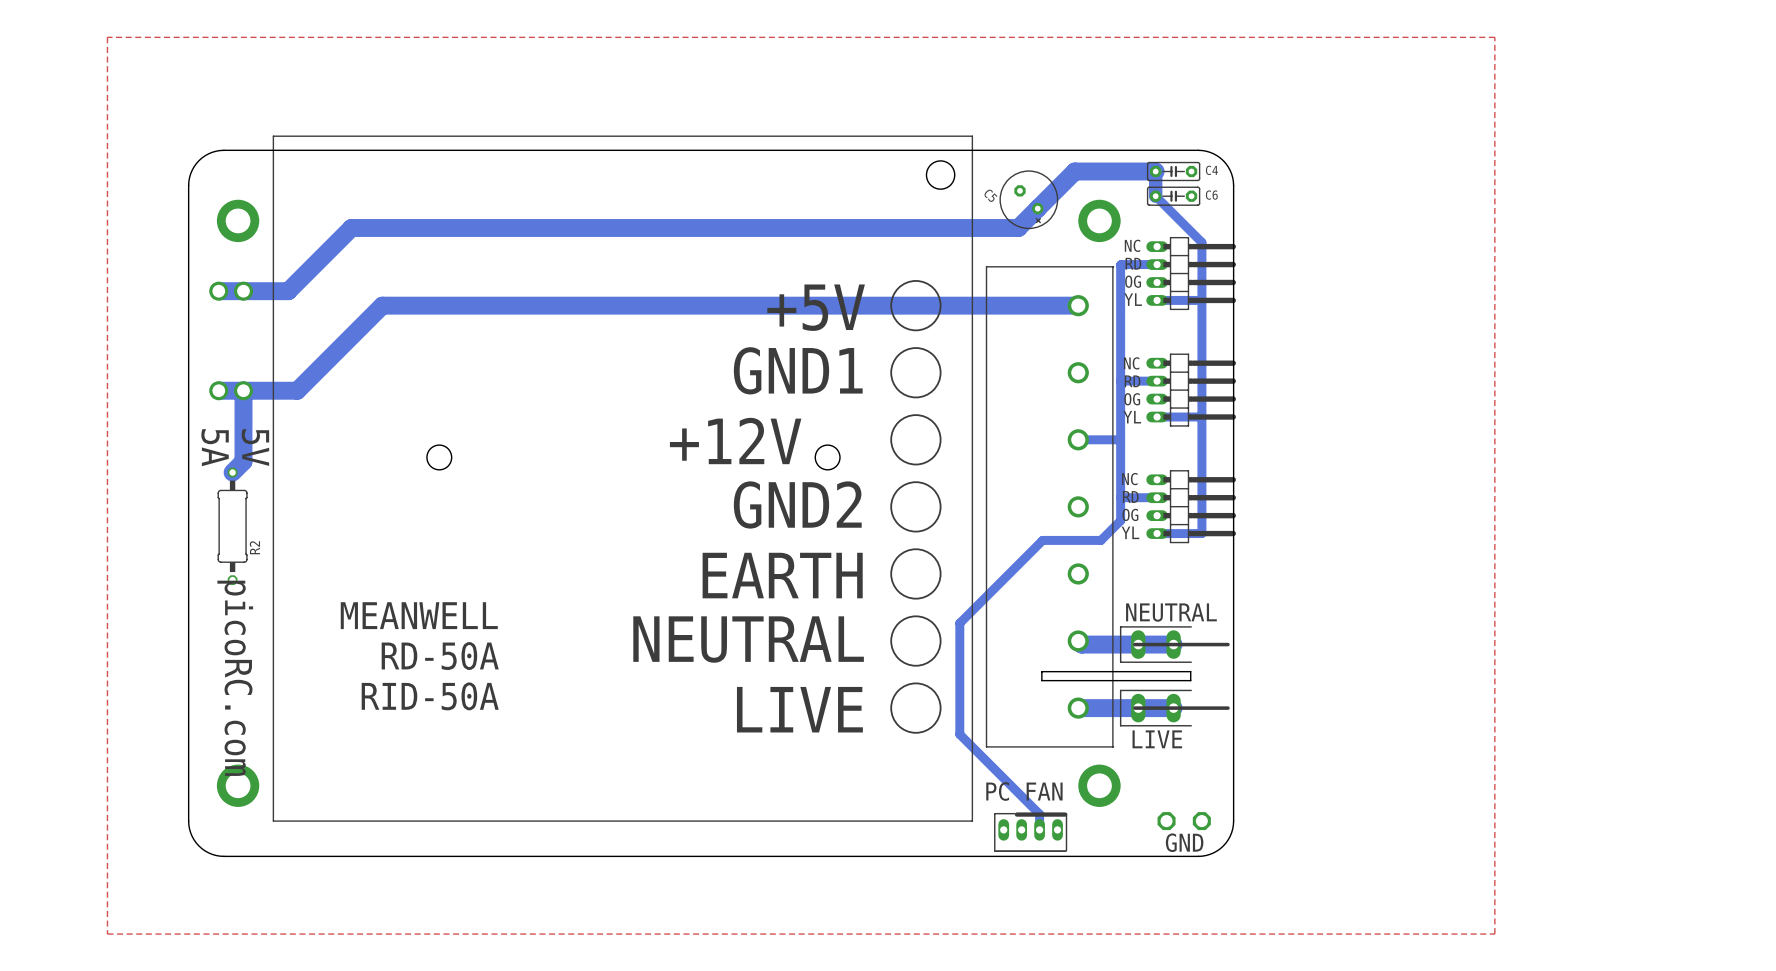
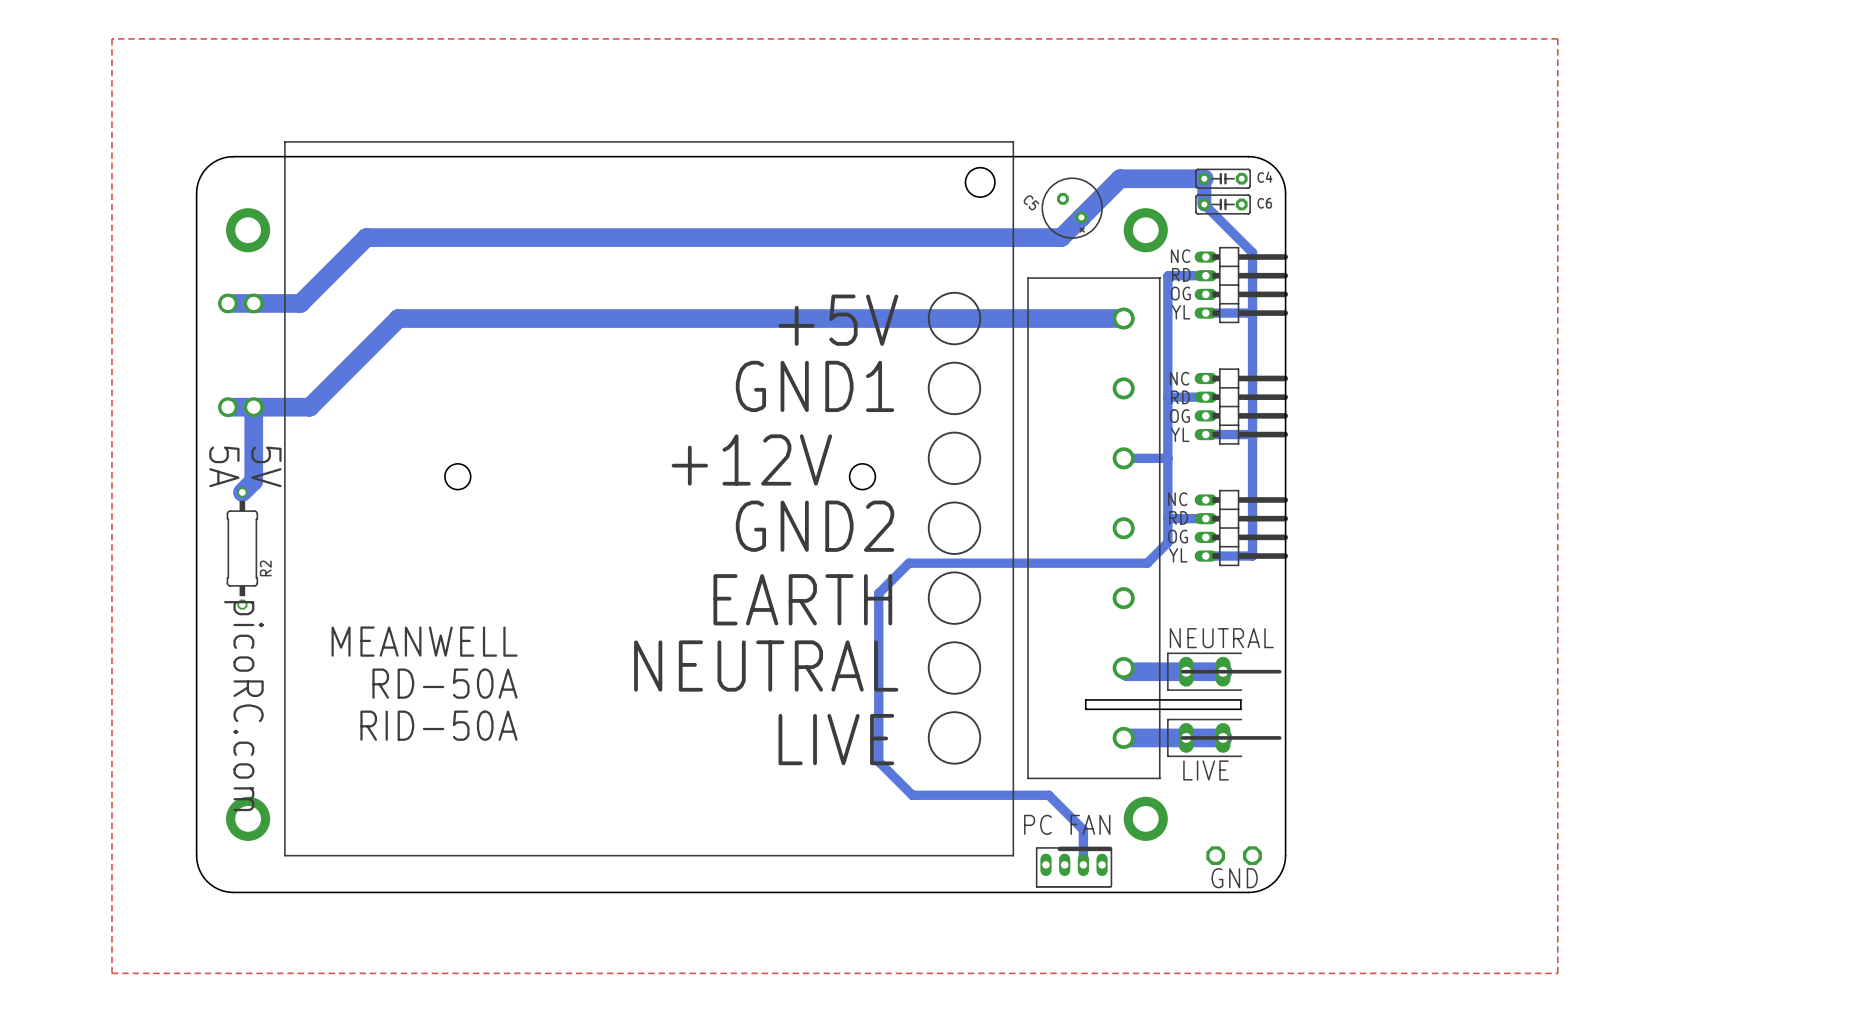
bottom track: (1042, 540) (959, 623) (959, 734) (1039, 814) -> (1086, 563) (909, 563) (878, 593) (878, 761) (912, 795) (1048, 795) (1083, 829) (1083, 848)

